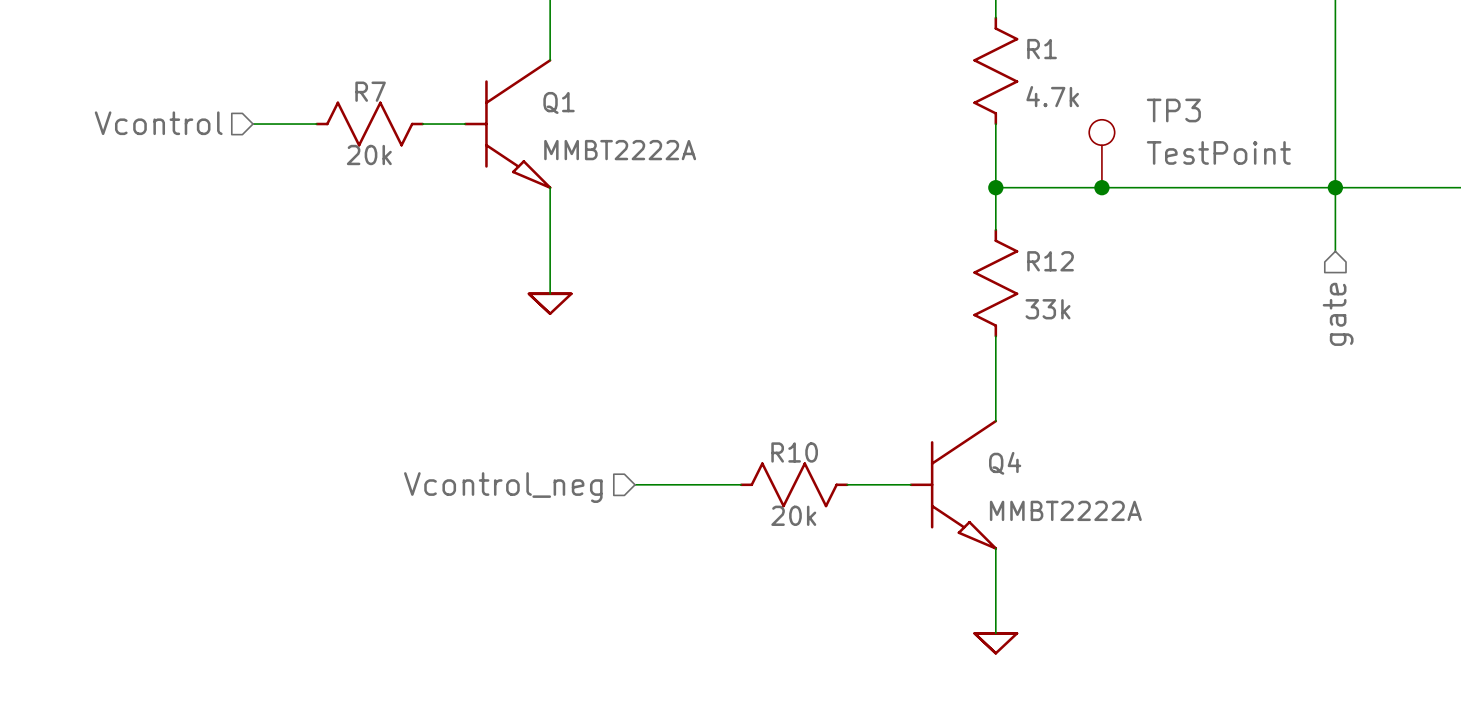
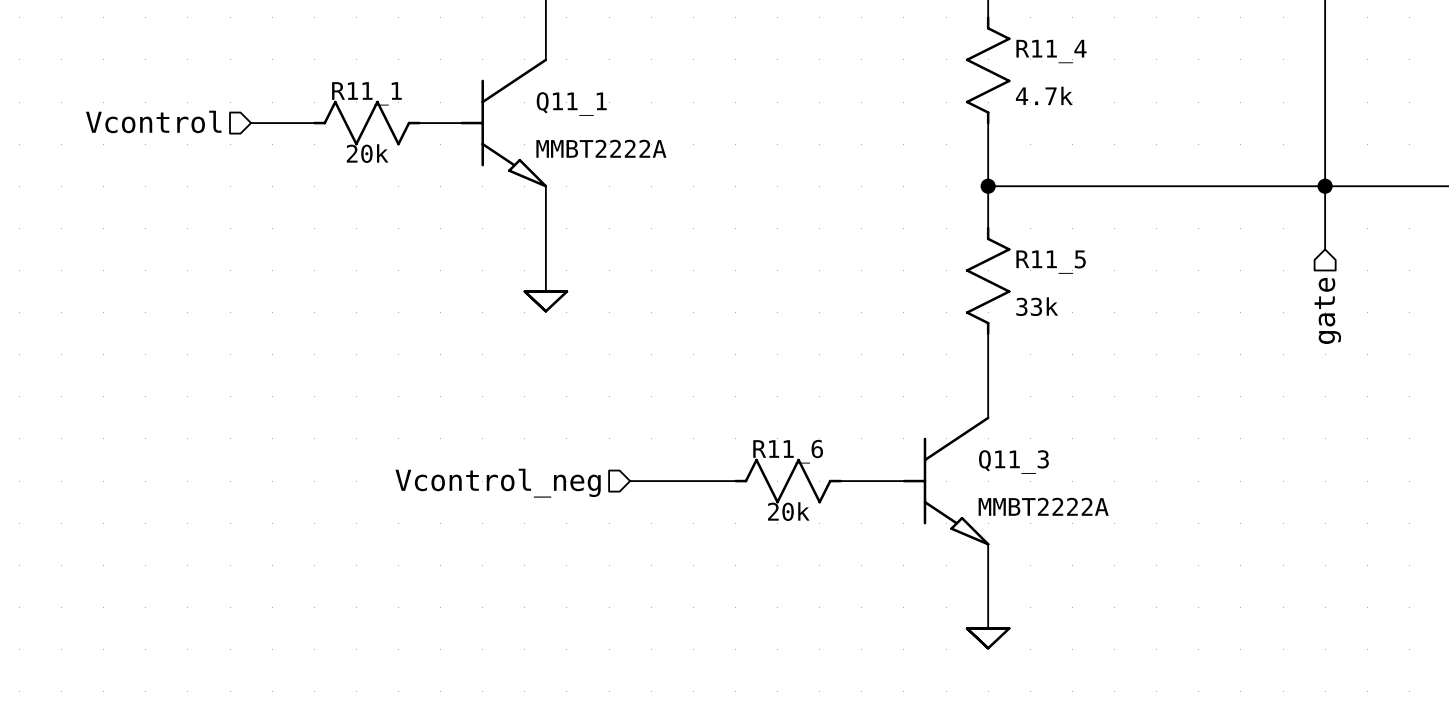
R1 name: R1 (1042, 49) -> R11_4 (1051, 51)
R7 name: R7 (370, 91) -> R11_1 (366, 93)
Q1 name: Q1 (559, 102) -> Q11_1 (571, 104)
TP3: TestPoint (1101, 153) -> none
junction: (1101, 187) -> none
R12 name: R12 (1050, 261) -> R11_5 (1051, 262)
R10 name: R10 (794, 452) -> R11_6 (788, 451)
Q4 name: Q4 (1005, 463) -> Q11_3 (1013, 462)

